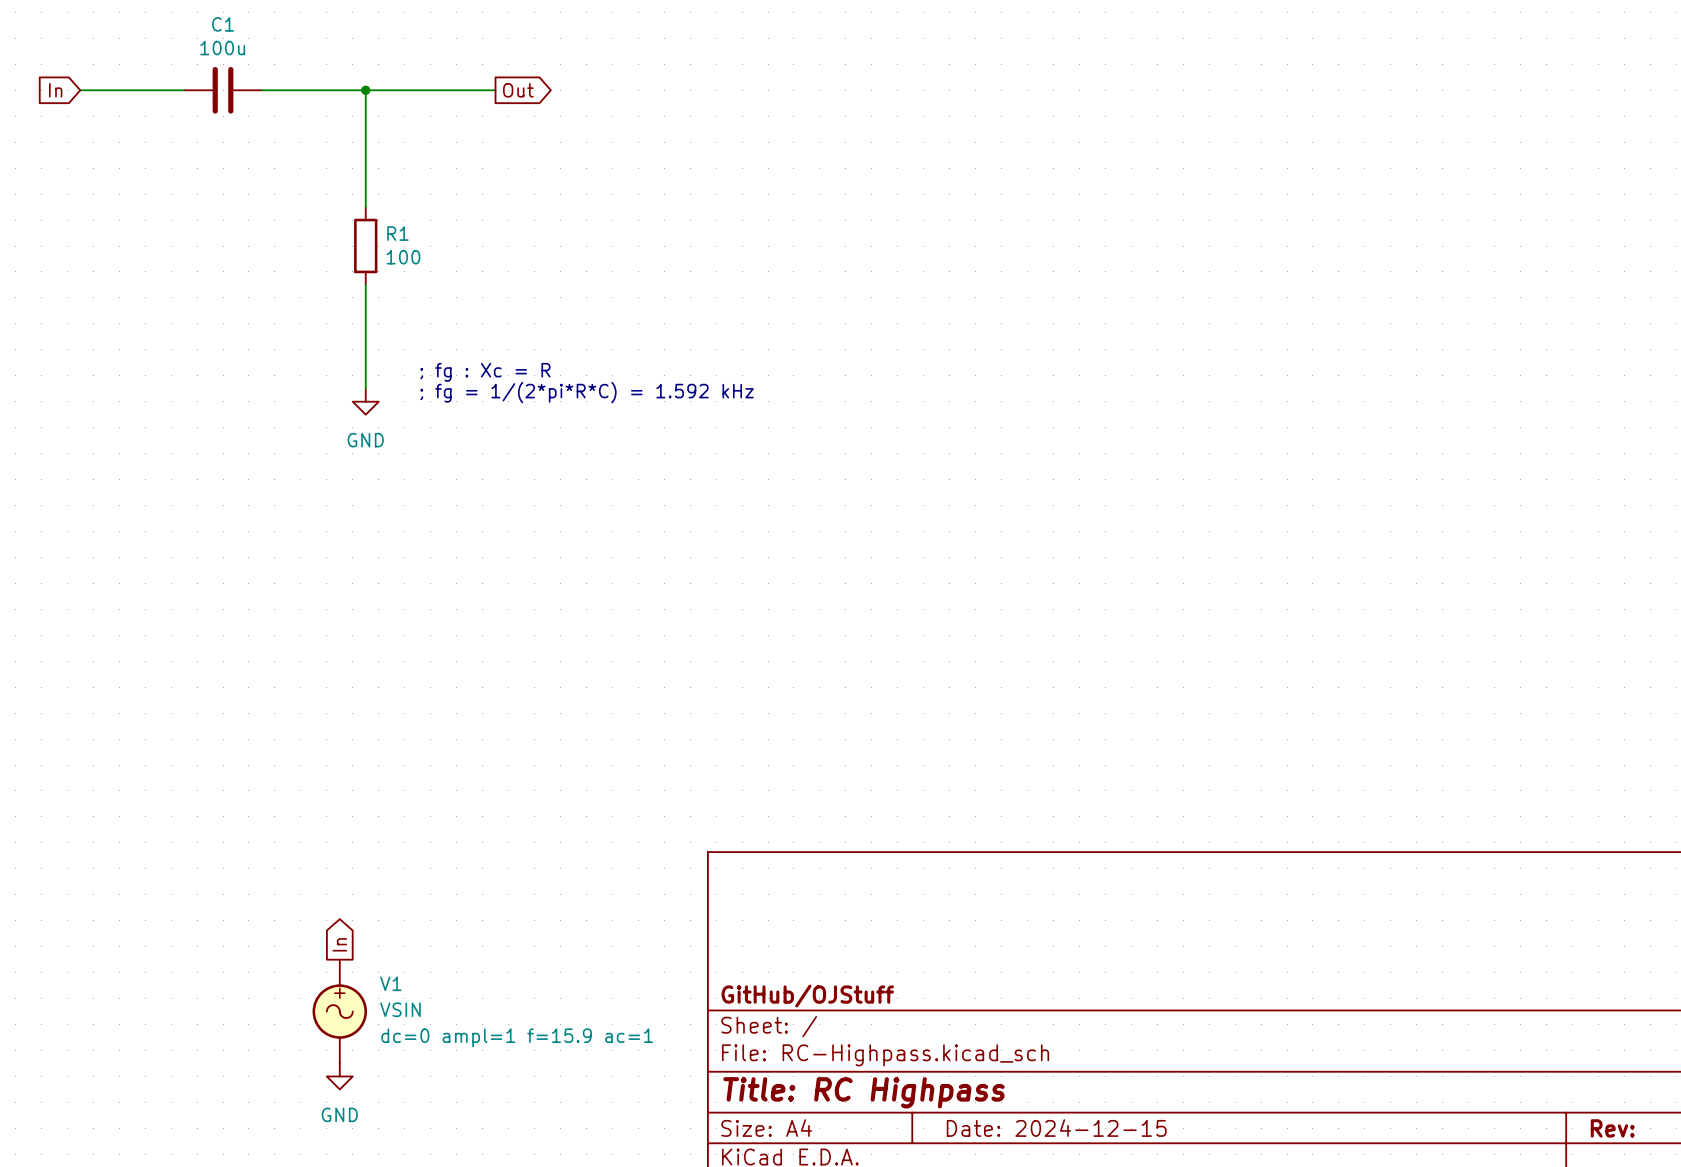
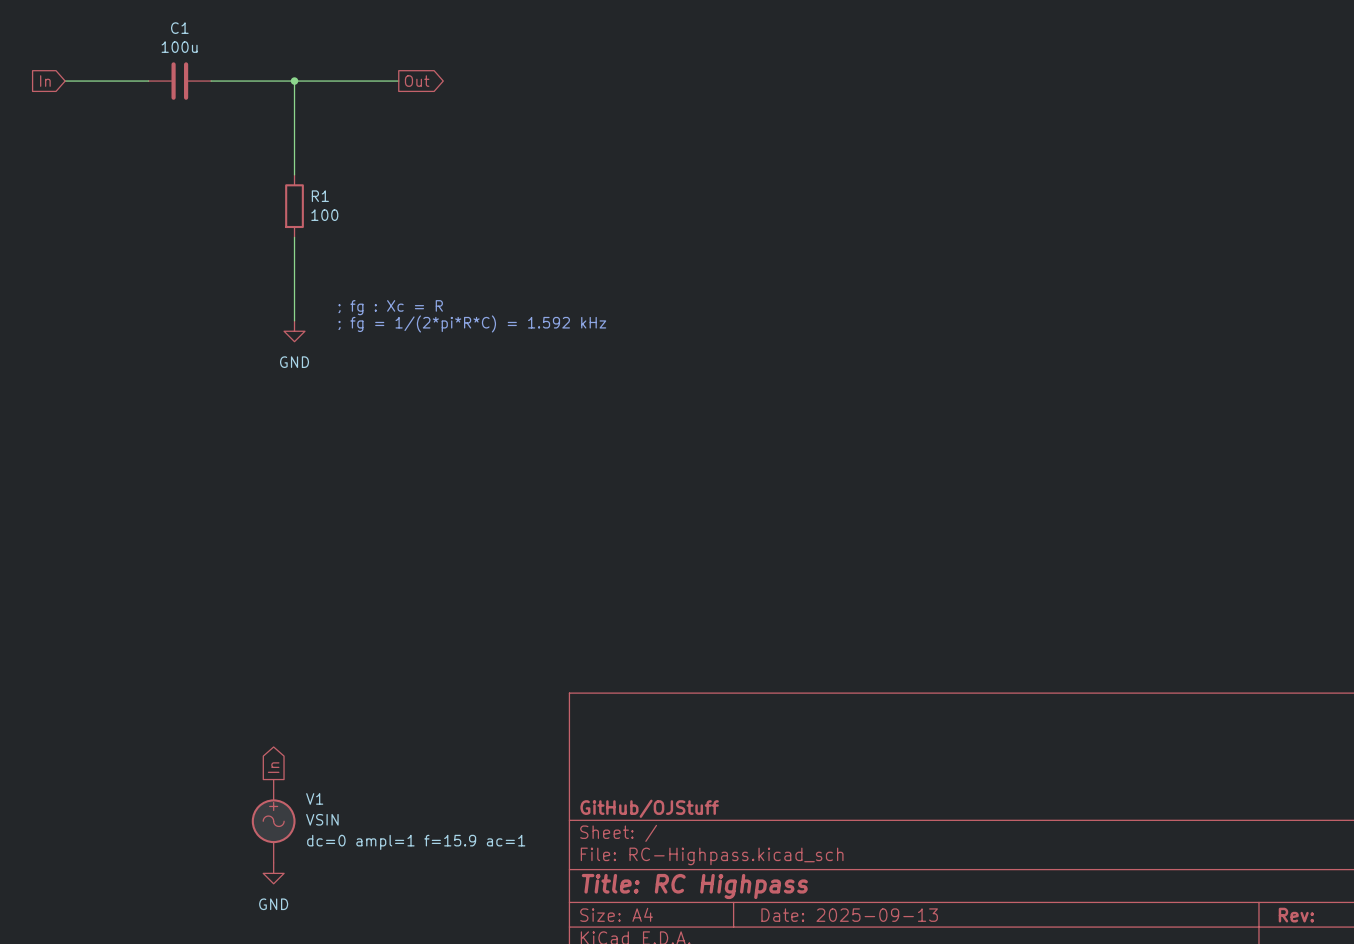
title block: Date: 2024-12-15 (1056, 1128) -> Date: 2025-09-13 (849, 915)

